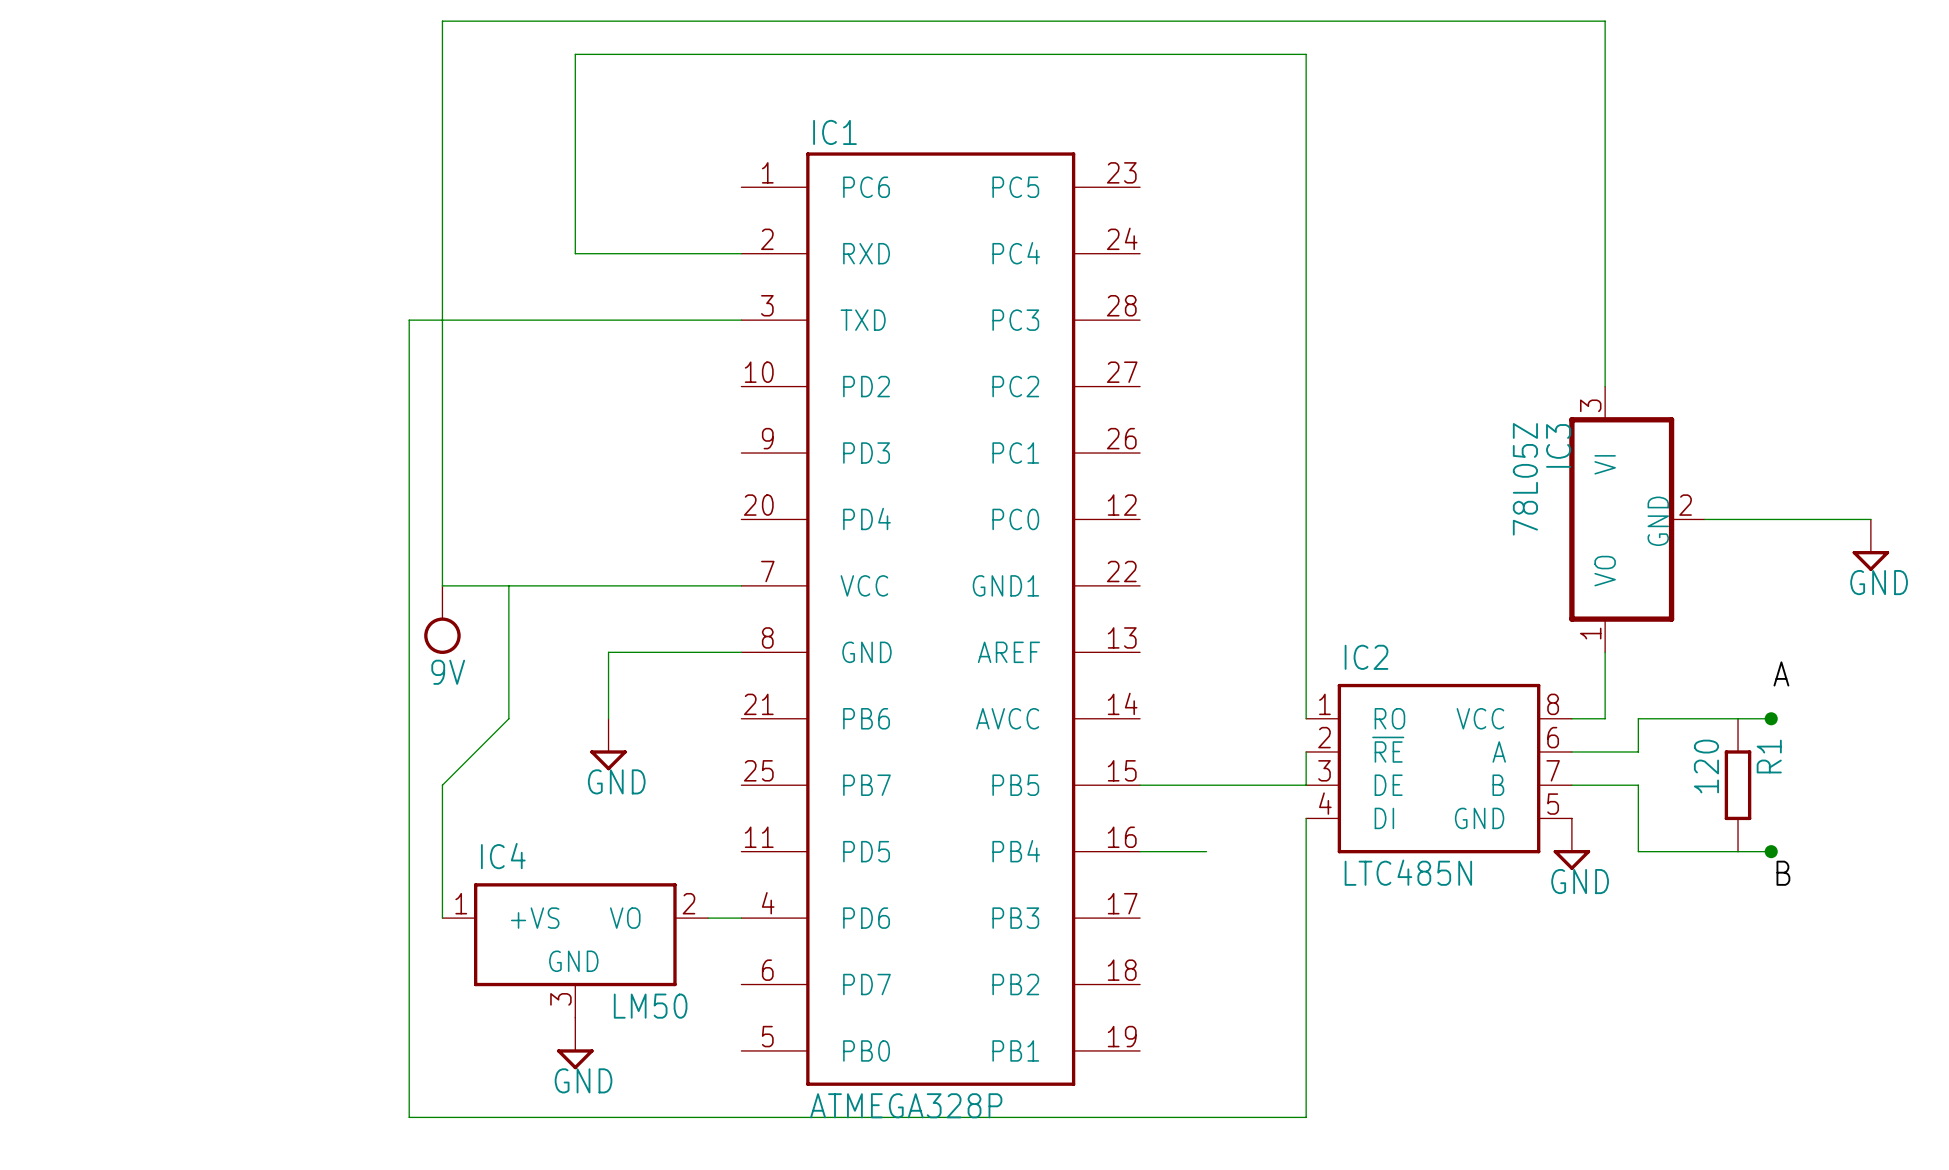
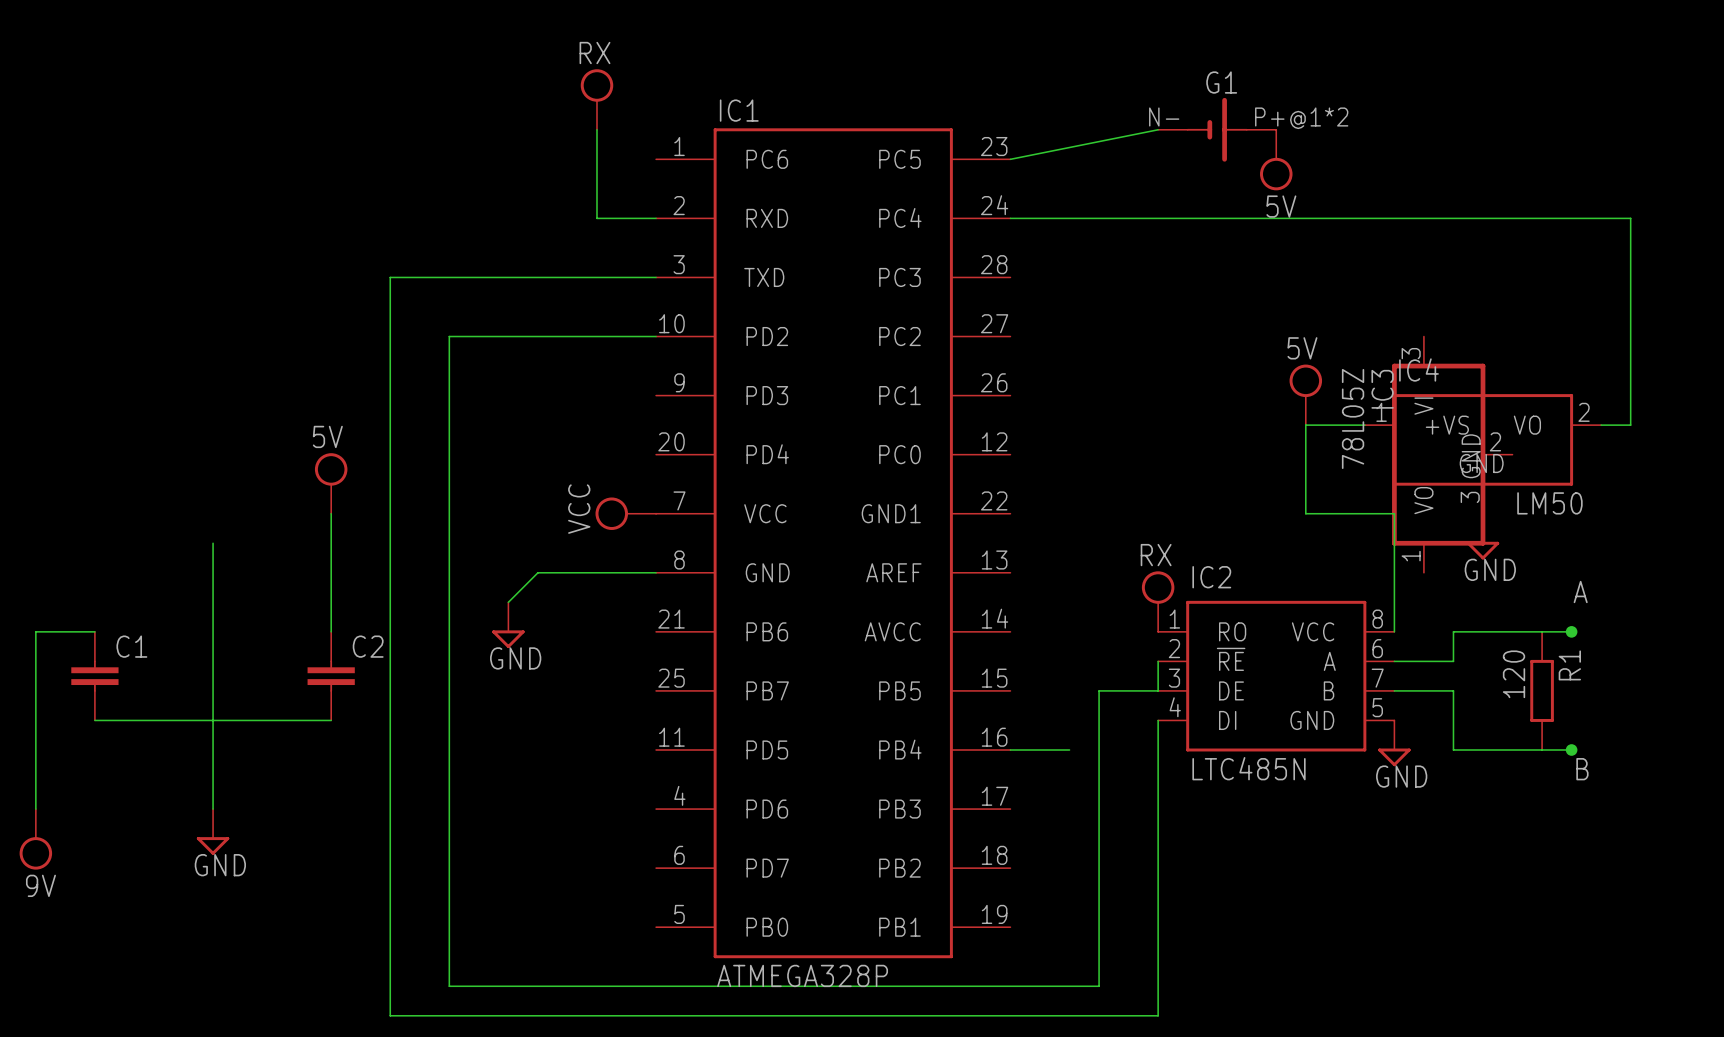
power symbol: none -> RX (596, 99)
wire: none -> (1158, 129) (1010, 159)
G1: none -> (1217, 129)
power symbol: none -> 5V (1276, 160)
wire: (674, 253) (575, 253) (575, 54) (1306, 54) (1306, 718) -> (596, 218) (596, 129)
wire: none -> (1010, 218) (1630, 218) (1630, 425) (1601, 425)
wire: none -> (656, 336) (449, 336) (449, 513)
wire: (1605, 386) (1605, 21) (442, 21) (442, 320) (409, 320) (409, 1117) (508, 1117) -> (449, 631) (449, 986)
power symbol: none -> 5V (1305, 394)
wire: (1704, 519) (1870, 519) -> none
power symbol position: GND (1870, 545) -> GND (1483, 536)
power symbol: none -> 5V (331, 483)
wire: none -> (331, 513) (331, 631)
wire: (442, 585) (741, 585) -> none
power symbol: none -> VCC (625, 513)
wire: none -> (213, 543) (213, 809)
power symbol: 9V (442, 619) -> none
wire: (608, 652) (608, 718) -> (537, 572) (508, 602)
wire: (1605, 652) (1605, 718) (1571, 718) -> (1364, 425) (1305, 425) (1305, 513) (1394, 513) (1394, 631)
power symbol: none -> RX (1158, 601)
wire: none -> (94, 631) (35, 631) (35, 809)
wire: (508, 718) (442, 785) -> (390, 513) (390, 690)
power symbol position: GND (608, 744) -> GND (508, 625)
C1: none -> (94, 676)
C2: none -> (331, 676)
wire: (1140, 785) (1239, 785) -> none
wire: none -> (94, 720) (331, 720)
wire: none -> (390, 809) (390, 1015) (1158, 1015) (1158, 986)
wire: (708, 918) (741, 918) -> none
power symbol: none -> GND (213, 831)
IC4 position: (575, 950) -> (1483, 453)
power symbol: none -> 9V (35, 839)
power symbol: GND (575, 1043) -> none
wire: (1239, 1117) (1306, 1117) -> (1099, 986) (1099, 690)

